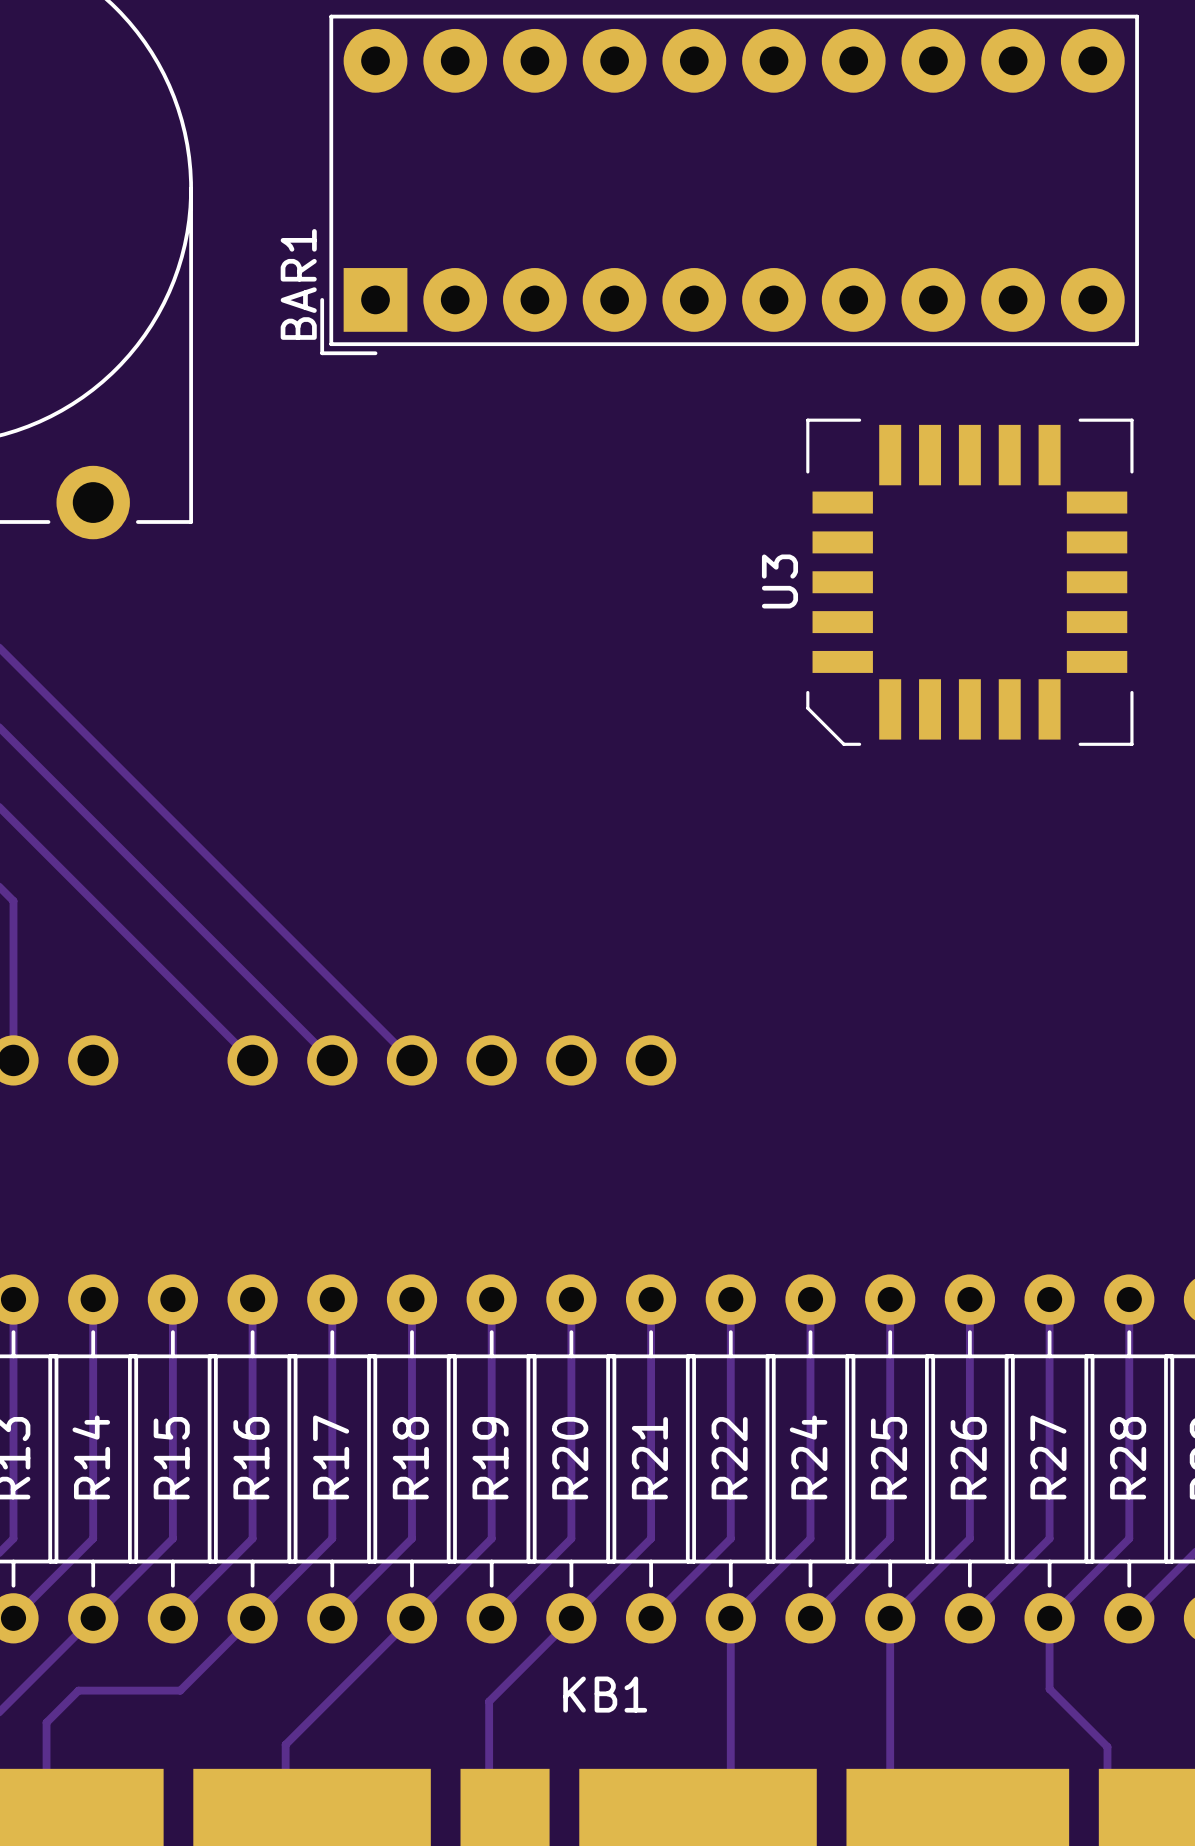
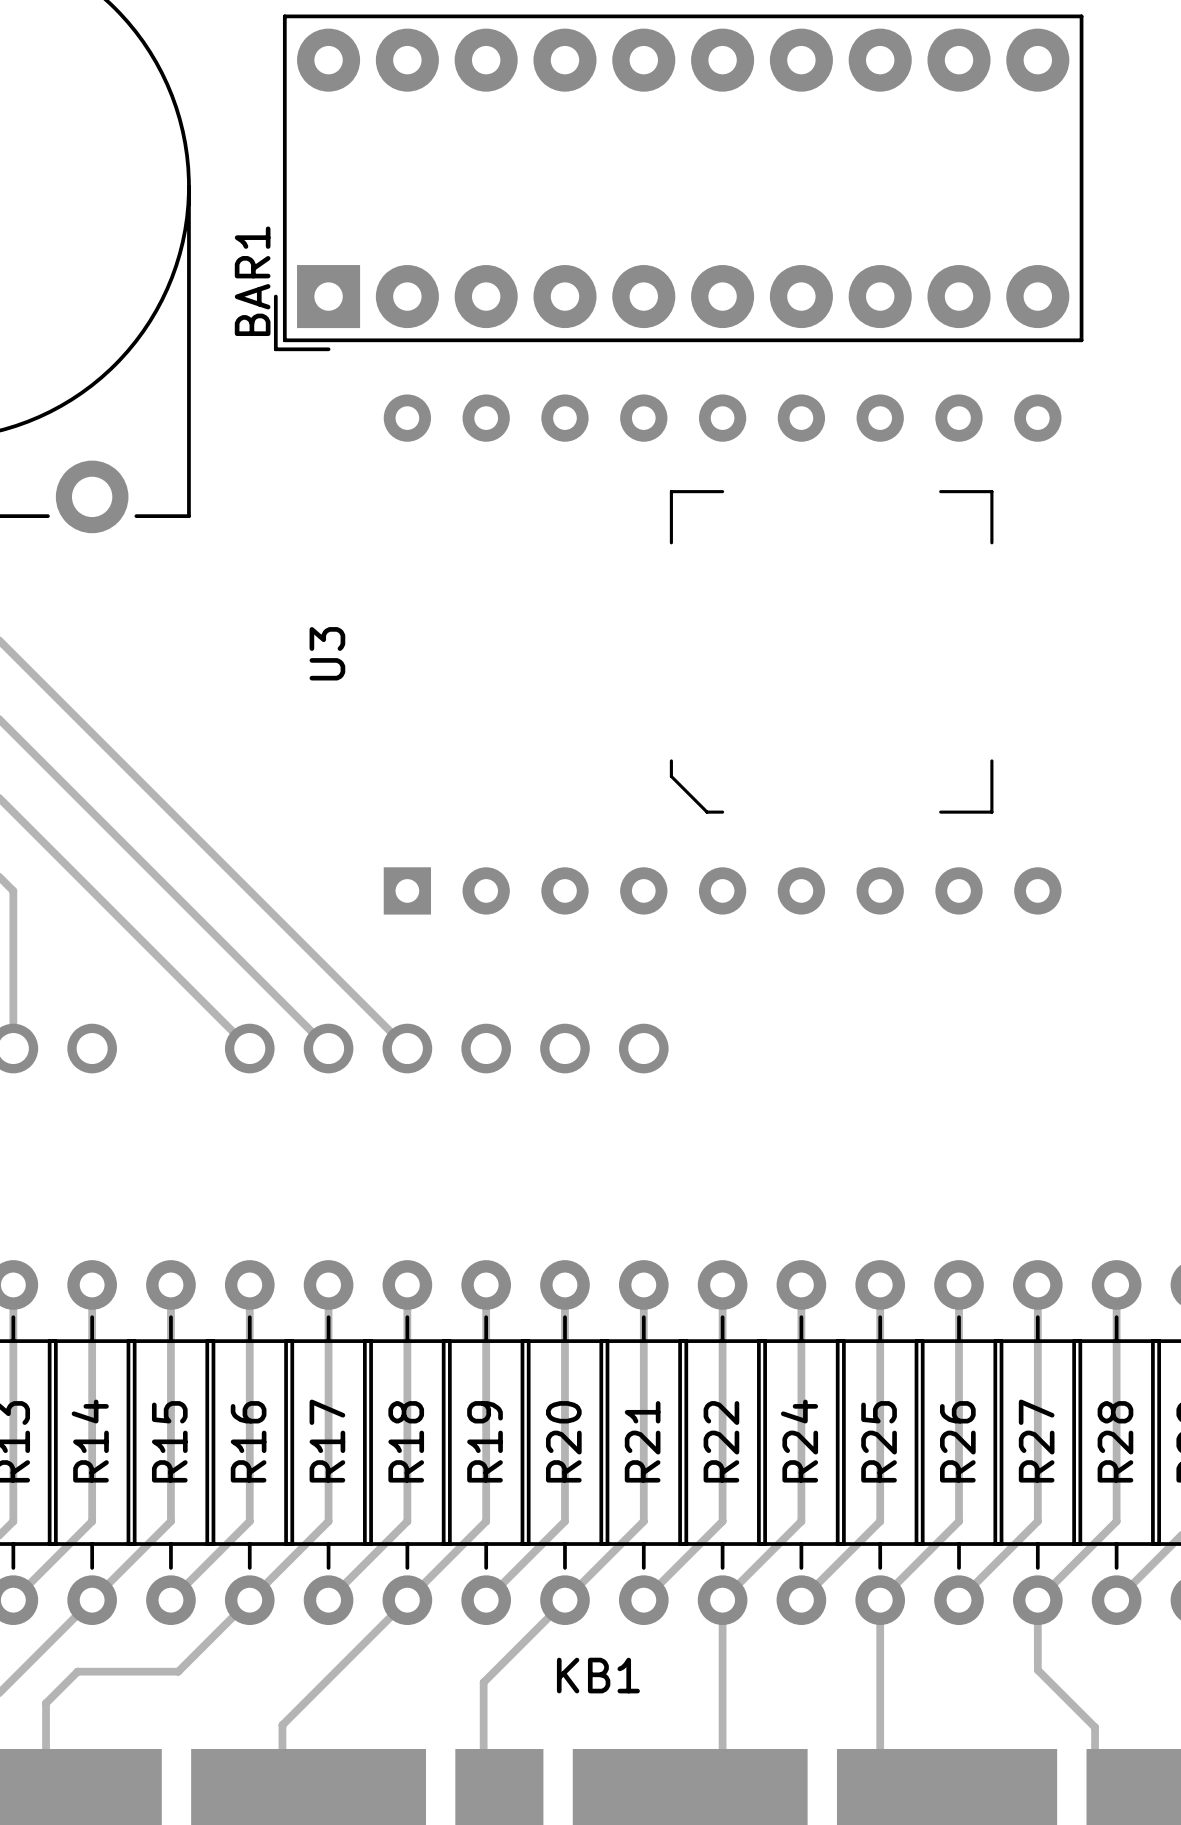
BAR1 position: (729, 184) -> (678, 182)
U3 footprint: [806, 418, 1134, 746] -> [383, 394, 1062, 915]
U3 name position: U3 (779, 581) -> U3 (327, 653)

